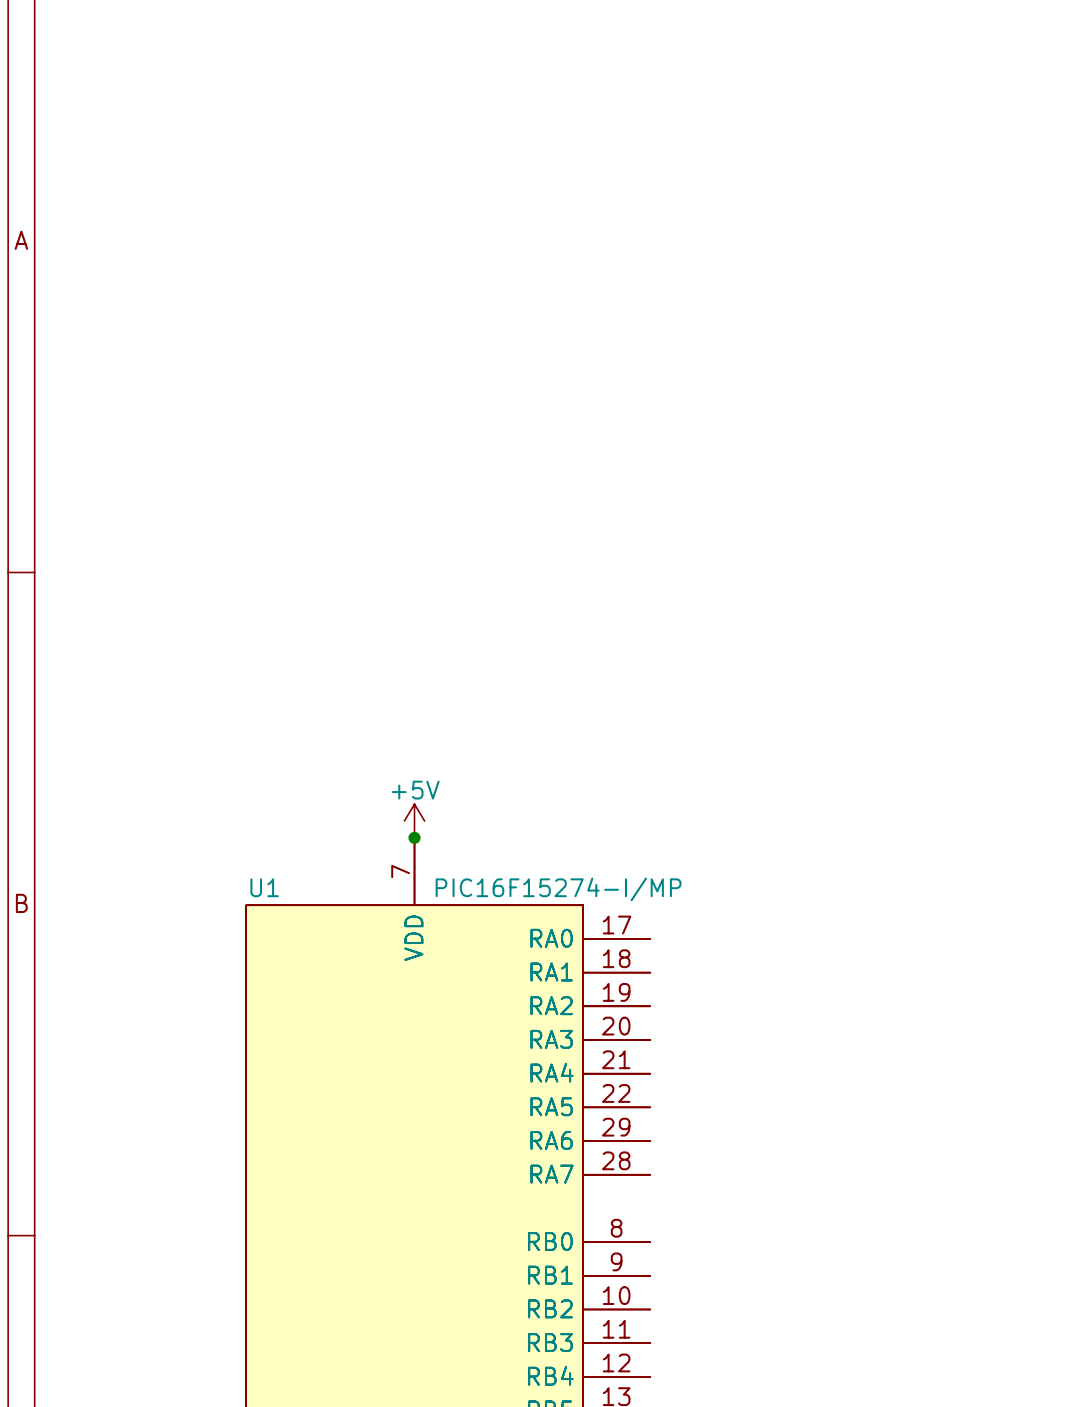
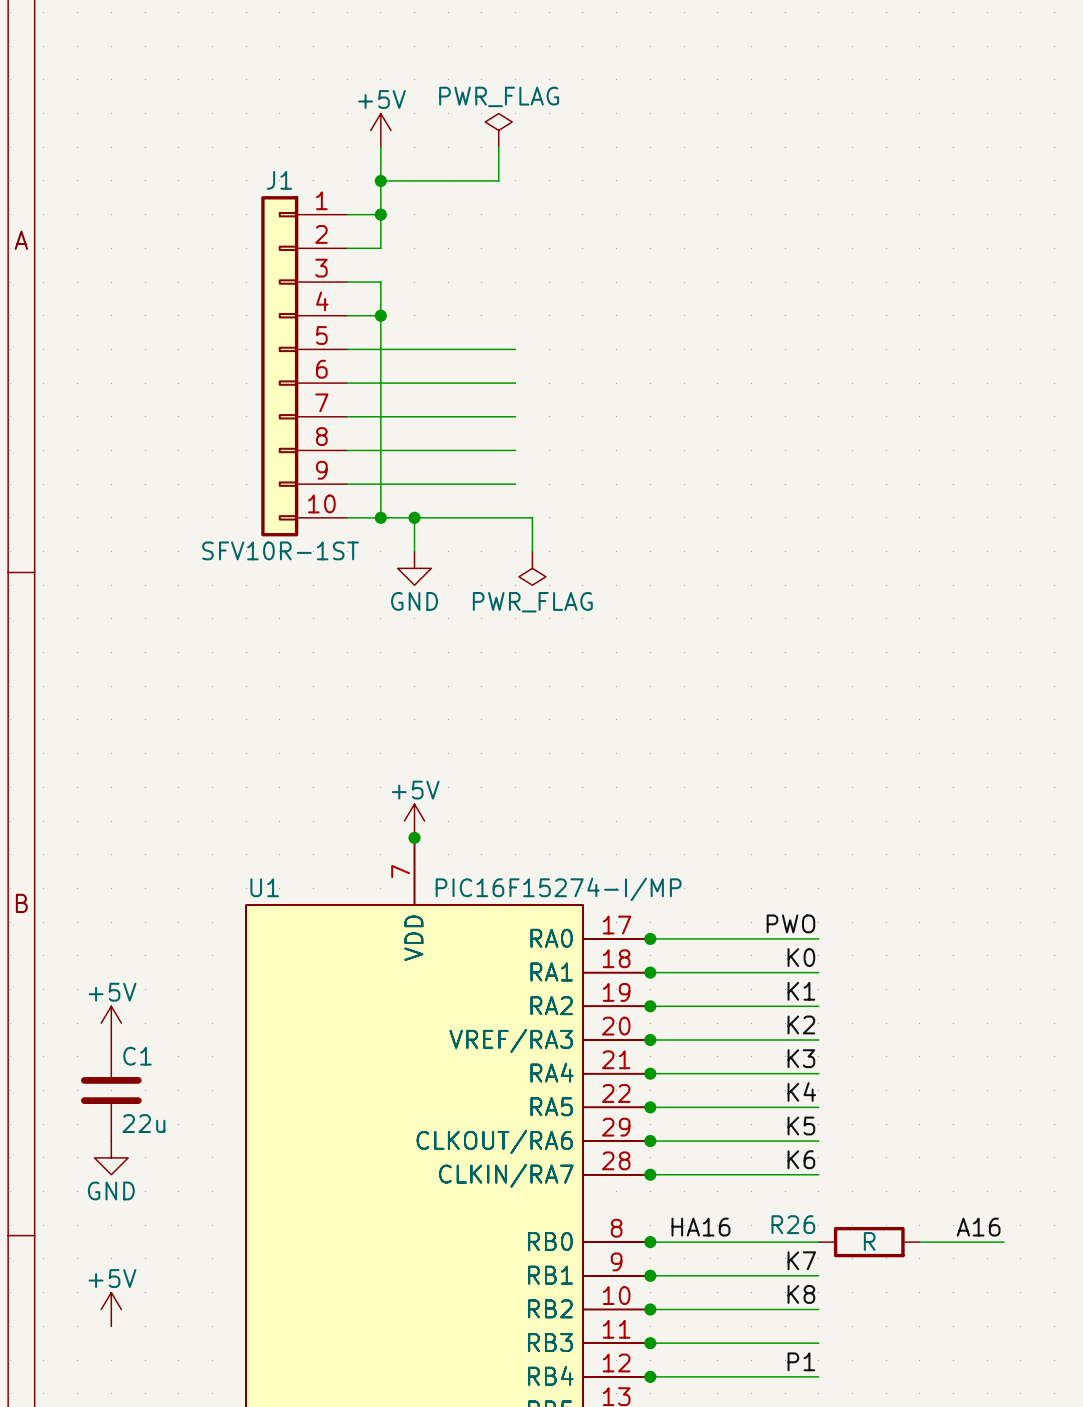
power symbol: none -> +5V (380, 130)
power symbol: none -> PWR_FLAG (498, 130)
wire: none -> (380, 147) (380, 248) (347, 248)
wire: none -> (498, 147) (498, 180) (380, 180)
junction: none -> (380, 180)
wire: none -> (347, 214) (380, 214)
junction: none -> (380, 214)
wire: none -> (347, 282) (380, 282) (380, 517)
wire: none -> (347, 315) (380, 315)
junction: none -> (380, 315)
wire: none -> (347, 349) (515, 349)
J1: none -> SFV10R-1ST (304, 366)
wire: none -> (347, 383) (515, 383)
wire: none -> (347, 416) (515, 416)
wire: none -> (347, 450) (515, 450)
wire: none -> (347, 484) (515, 484)
wire: none -> (347, 517) (532, 517) (532, 551)
junction: none -> (380, 517)
wire: none -> (414, 517) (414, 551)
junction: none -> (414, 517)
power symbol: none -> GND (414, 568)
power symbol: none -> PWR_FLAG (532, 568)
label: none -> PWO (790, 923)
wire: none -> (650, 938) (818, 938)
junction: none -> (650, 938)
label: none -> K0 (801, 957)
wire: none -> (650, 972) (818, 972)
junction: none -> (650, 972)
label: none -> K1 (801, 991)
wire: none -> (650, 1006) (818, 1006)
junction: none -> (650, 1006)
power symbol: none -> +5V (111, 1023)
label: none -> K2 (801, 1024)
U1 pin name: RA3 (551, 1039) -> VREF/RA3 (511, 1040)
part pin name: RA3 (551, 1039) -> VREF/RA3 (511, 1040)
wire: none -> (650, 1039) (818, 1039)
junction: none -> (650, 1039)
label: none -> K3 (801, 1058)
wire: none -> (650, 1073) (818, 1073)
junction: none -> (650, 1073)
C1: none -> 22u (111, 1090)
label: none -> K4 (801, 1091)
wire: none -> (650, 1107) (818, 1107)
junction: none -> (650, 1107)
label: none -> K5 (801, 1126)
U1 pin name: RA6 (551, 1140) -> CLKOUT/RA6 (494, 1142)
part pin name: RA6 (551, 1140) -> CLKOUT/RA6 (494, 1142)
wire: none -> (650, 1141) (818, 1141)
junction: none -> (650, 1141)
power symbol: none -> GND (111, 1157)
label: none -> K6 (801, 1159)
U1 pin name: RA7 (552, 1174) -> CLKIN/RA7 (506, 1175)
part pin name: RA7 (552, 1174) -> CLKIN/RA7 (506, 1175)
wire: none -> (650, 1174) (818, 1174)
junction: none -> (650, 1174)
label: none -> HA16 (700, 1227)
label: none -> A16 (978, 1227)
wire: none -> (650, 1242) (818, 1242)
junction: none -> (650, 1242)
R26: none -> R (869, 1242)
wire: none -> (919, 1242) (1004, 1242)
label: none -> K7 (801, 1260)
wire: none -> (650, 1275) (818, 1275)
junction: none -> (650, 1275)
label: none -> K8 (801, 1294)
power symbol: none -> +5V (111, 1309)
wire: none -> (650, 1309) (818, 1309)
junction: none -> (650, 1309)
wire: none -> (650, 1343) (818, 1343)
junction: none -> (650, 1343)
label: none -> P1 (801, 1361)
wire: none -> (650, 1376) (818, 1376)
junction: none -> (650, 1376)

